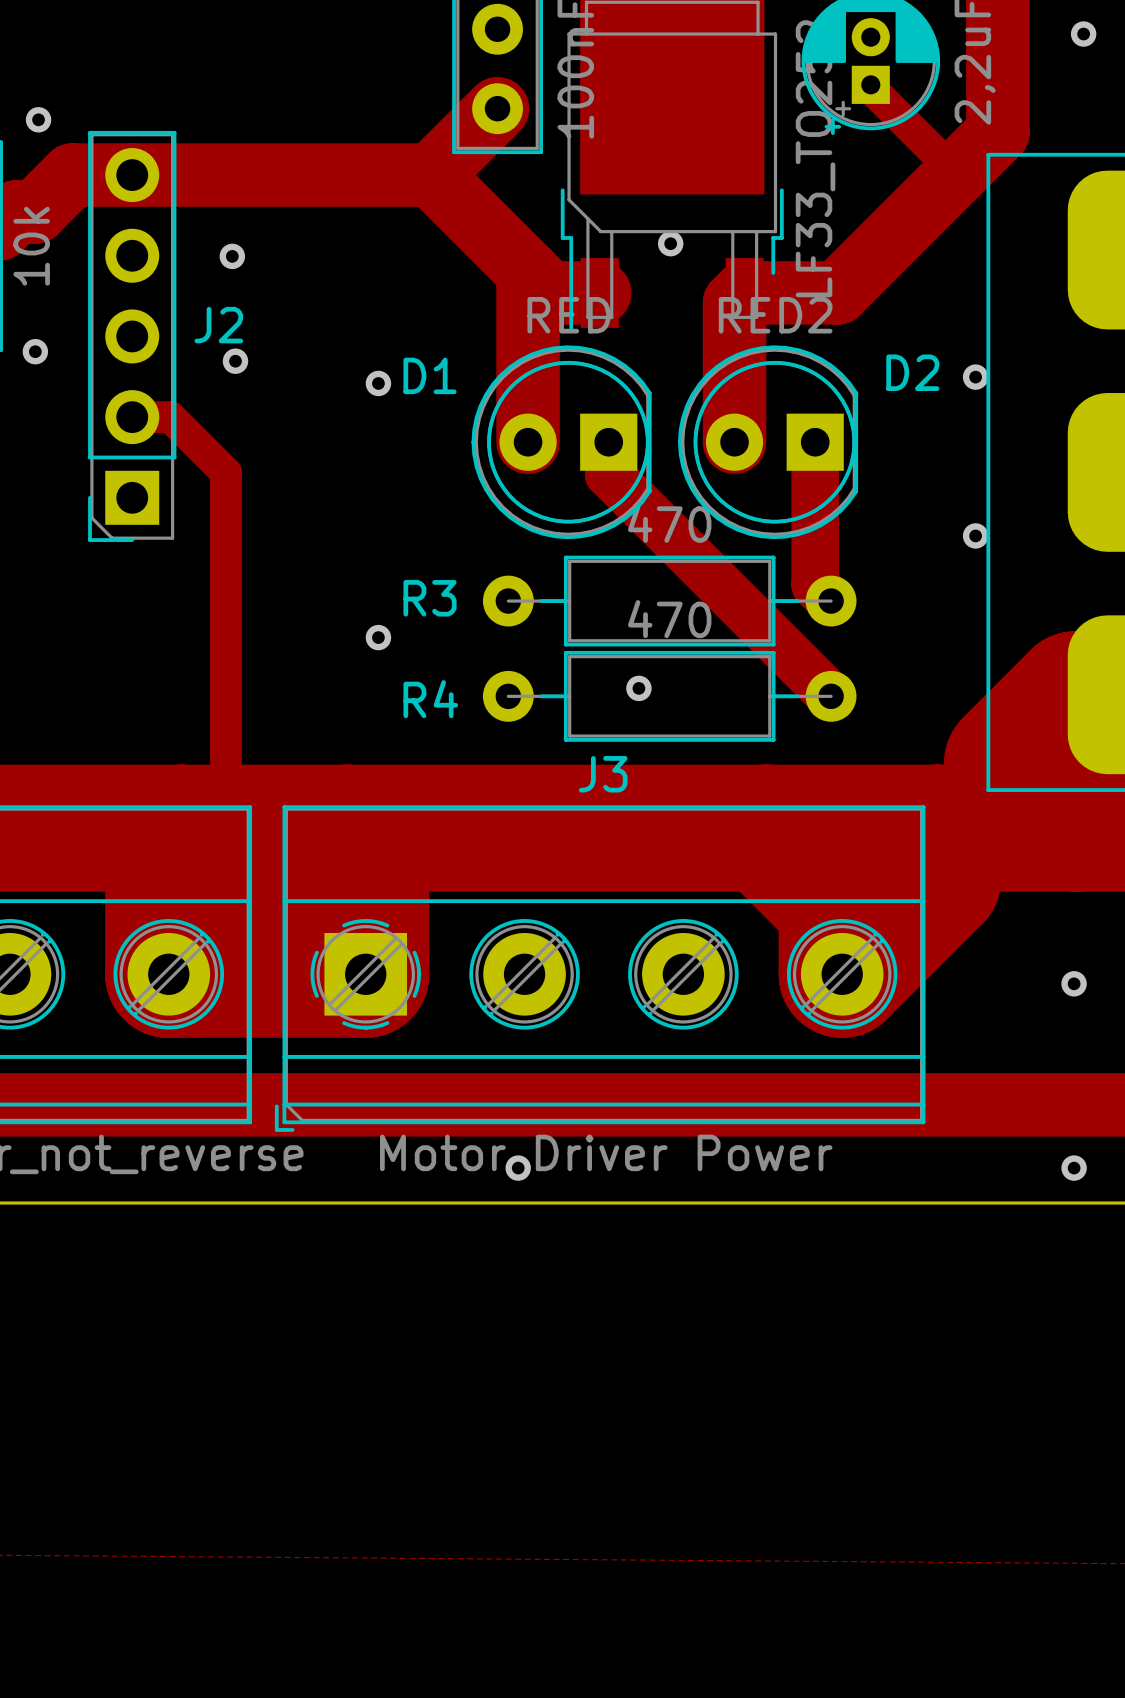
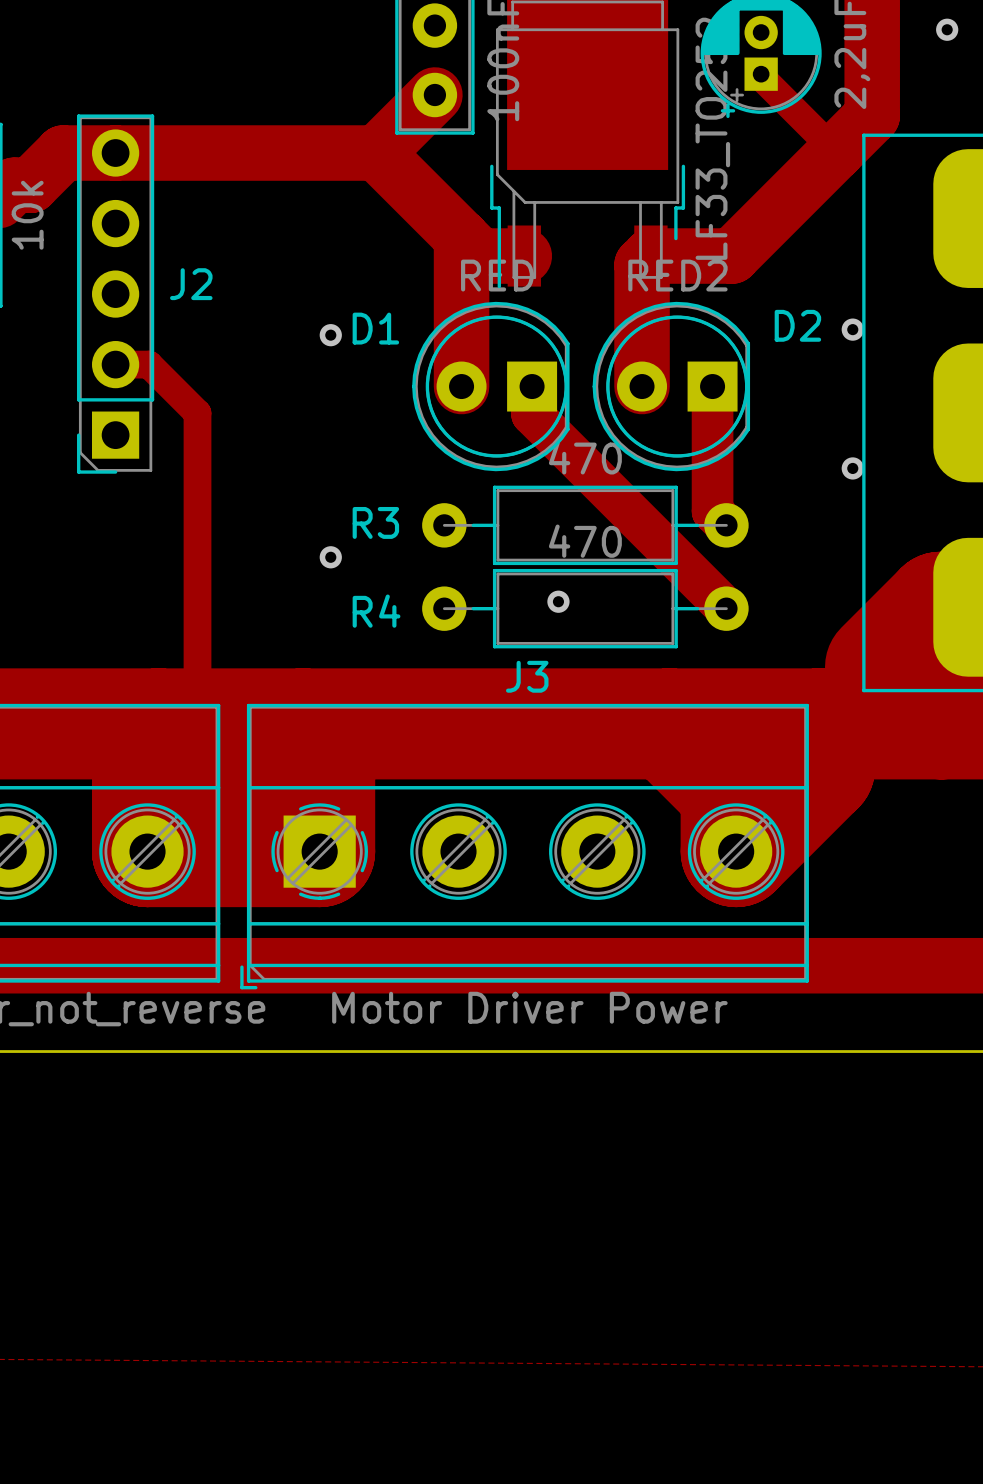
via: (38, 119) -> none
via: (670, 243) -> none
via: (232, 256) -> none
via: (35, 351) -> none
via: (235, 361) -> none
via: (1074, 983) -> none
via: (518, 1168) -> none
via: (1074, 1168) -> none

